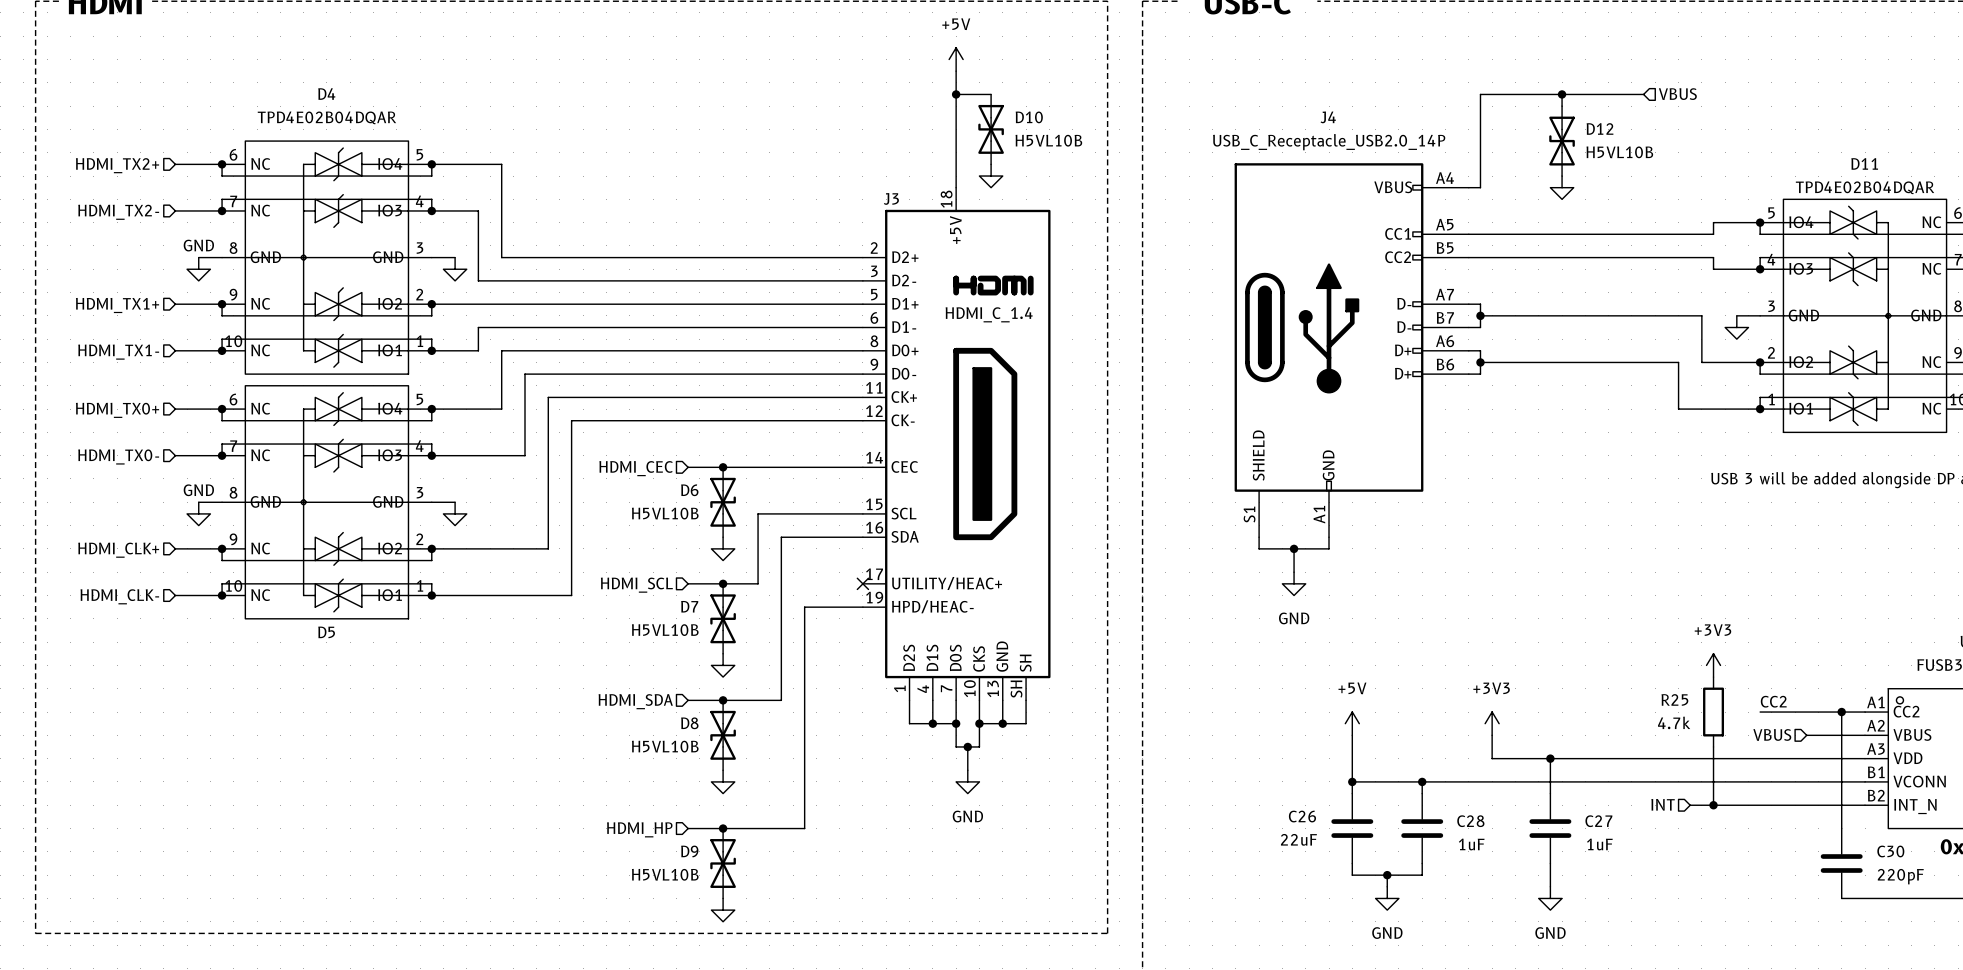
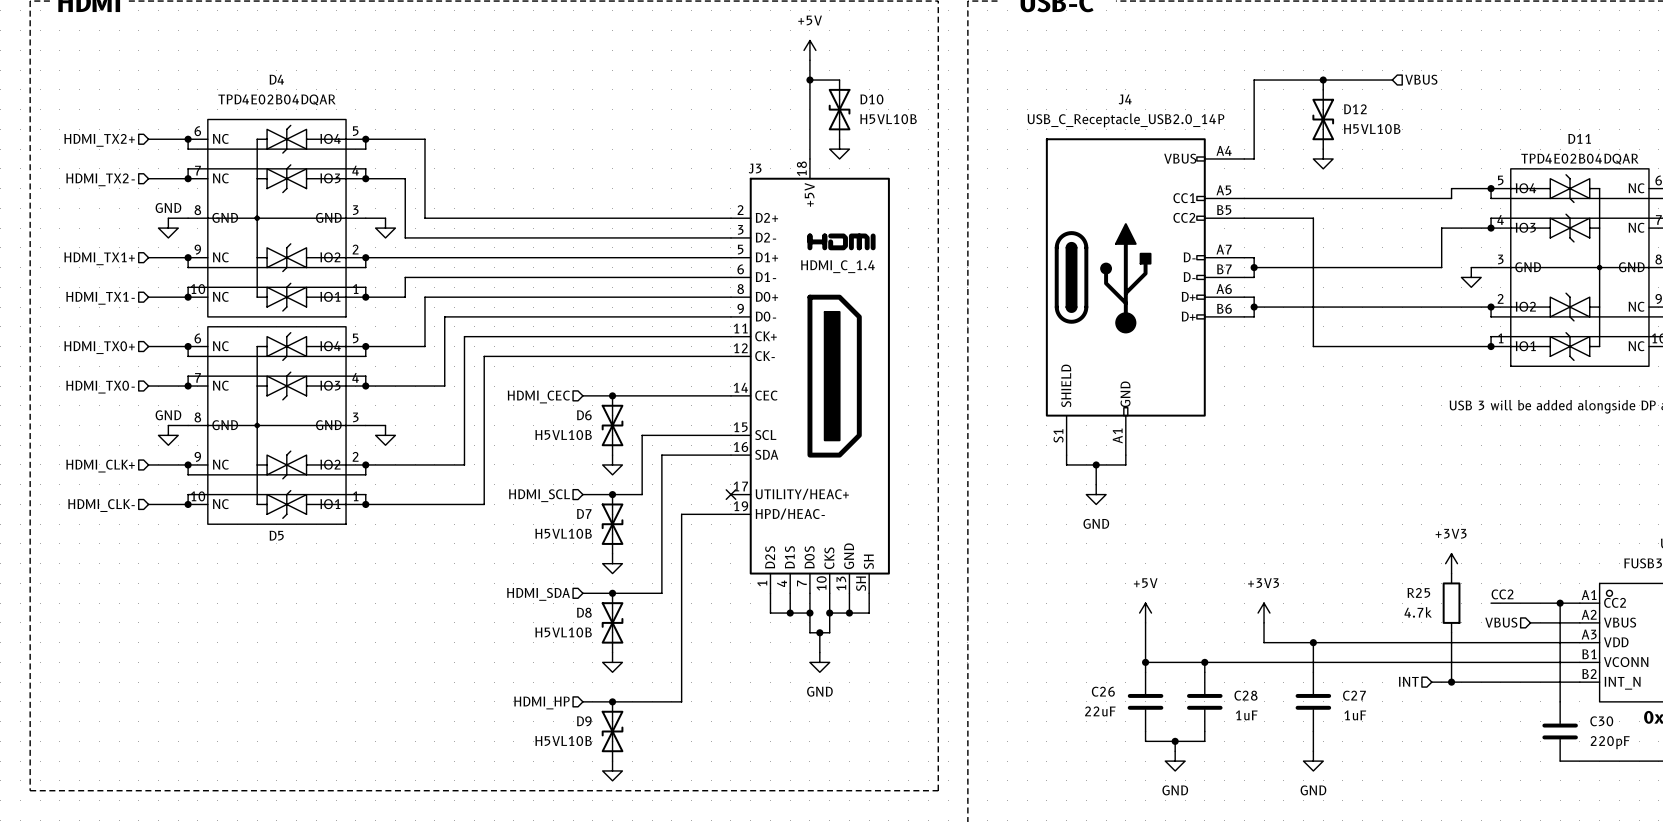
wire: (1550, 257) (1713, 257) (1713, 269) -> (1313, 218) (1313, 346) (1421, 346)
wire: none -> (1451, 228) (1441, 228) (1441, 267)
wire: (1701, 315) (1701, 362) -> (1421, 307) (1441, 307)
wire: (1678, 362) (1678, 409) -> none

